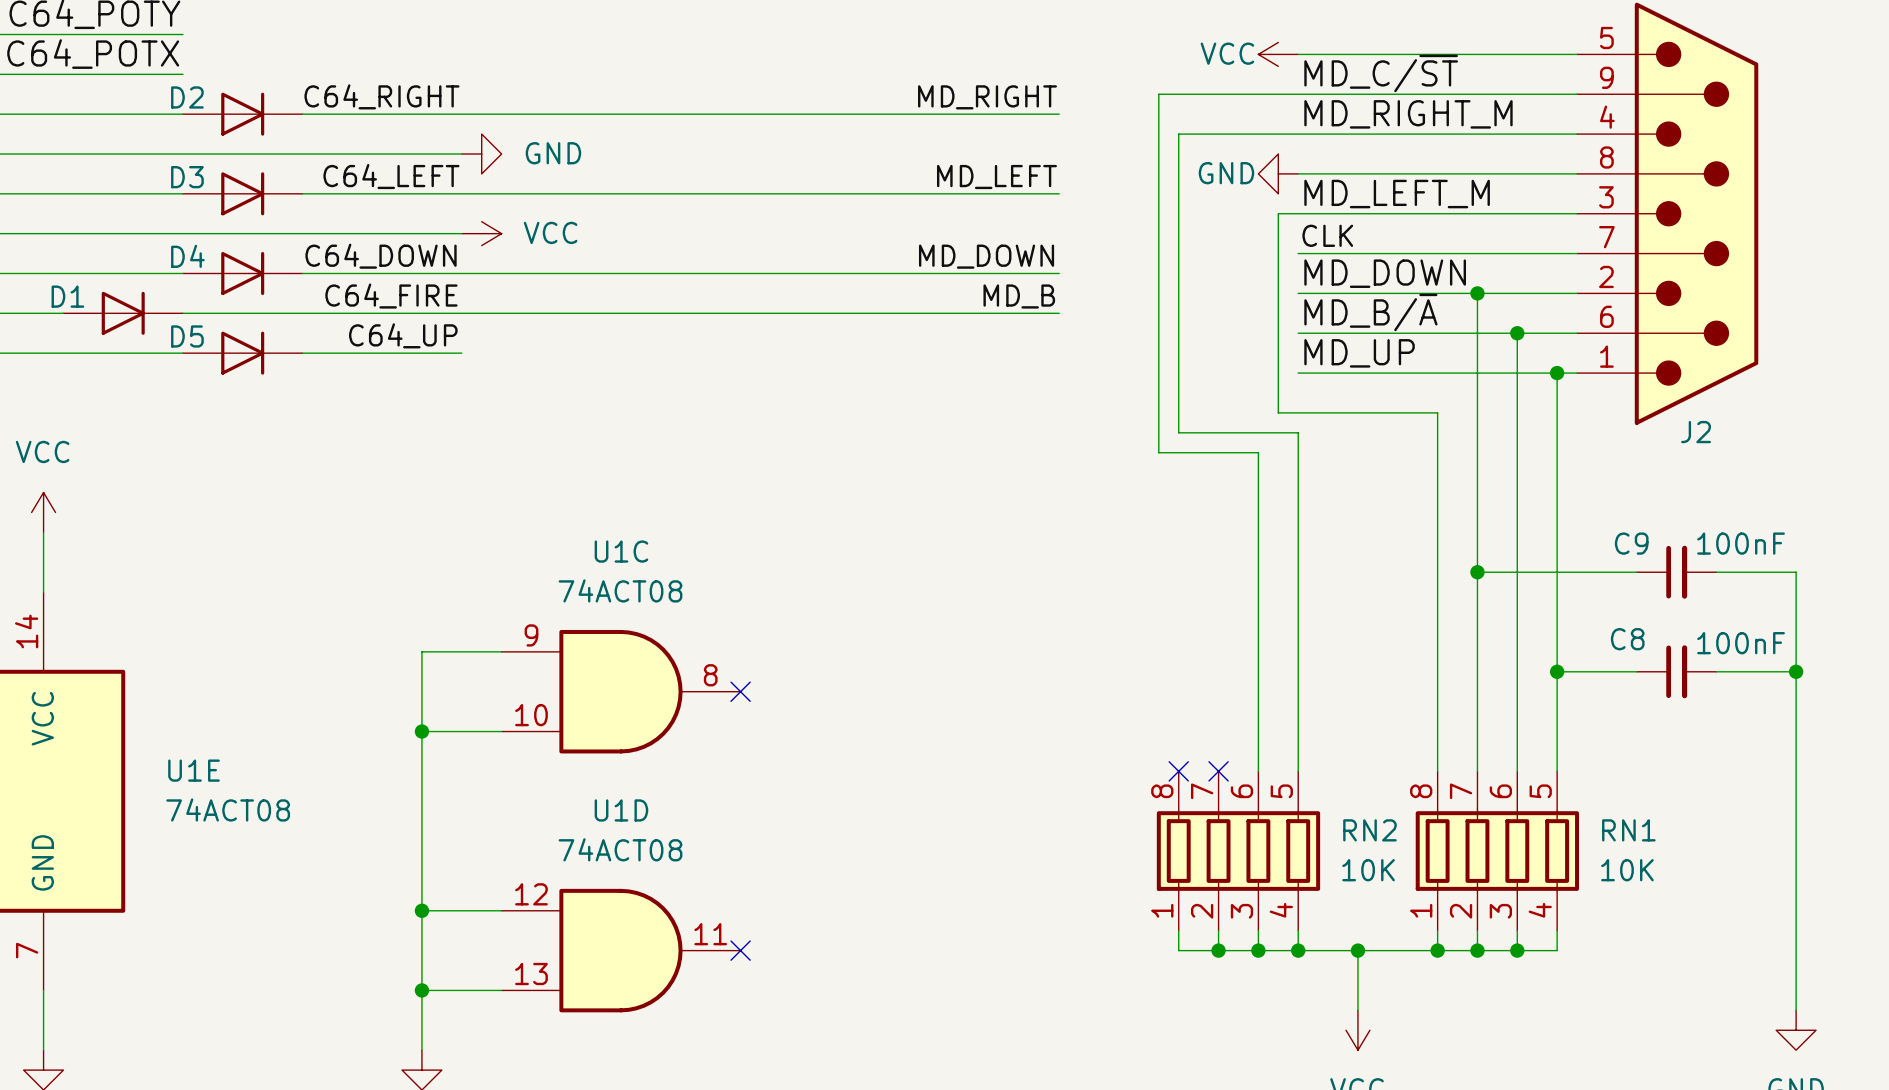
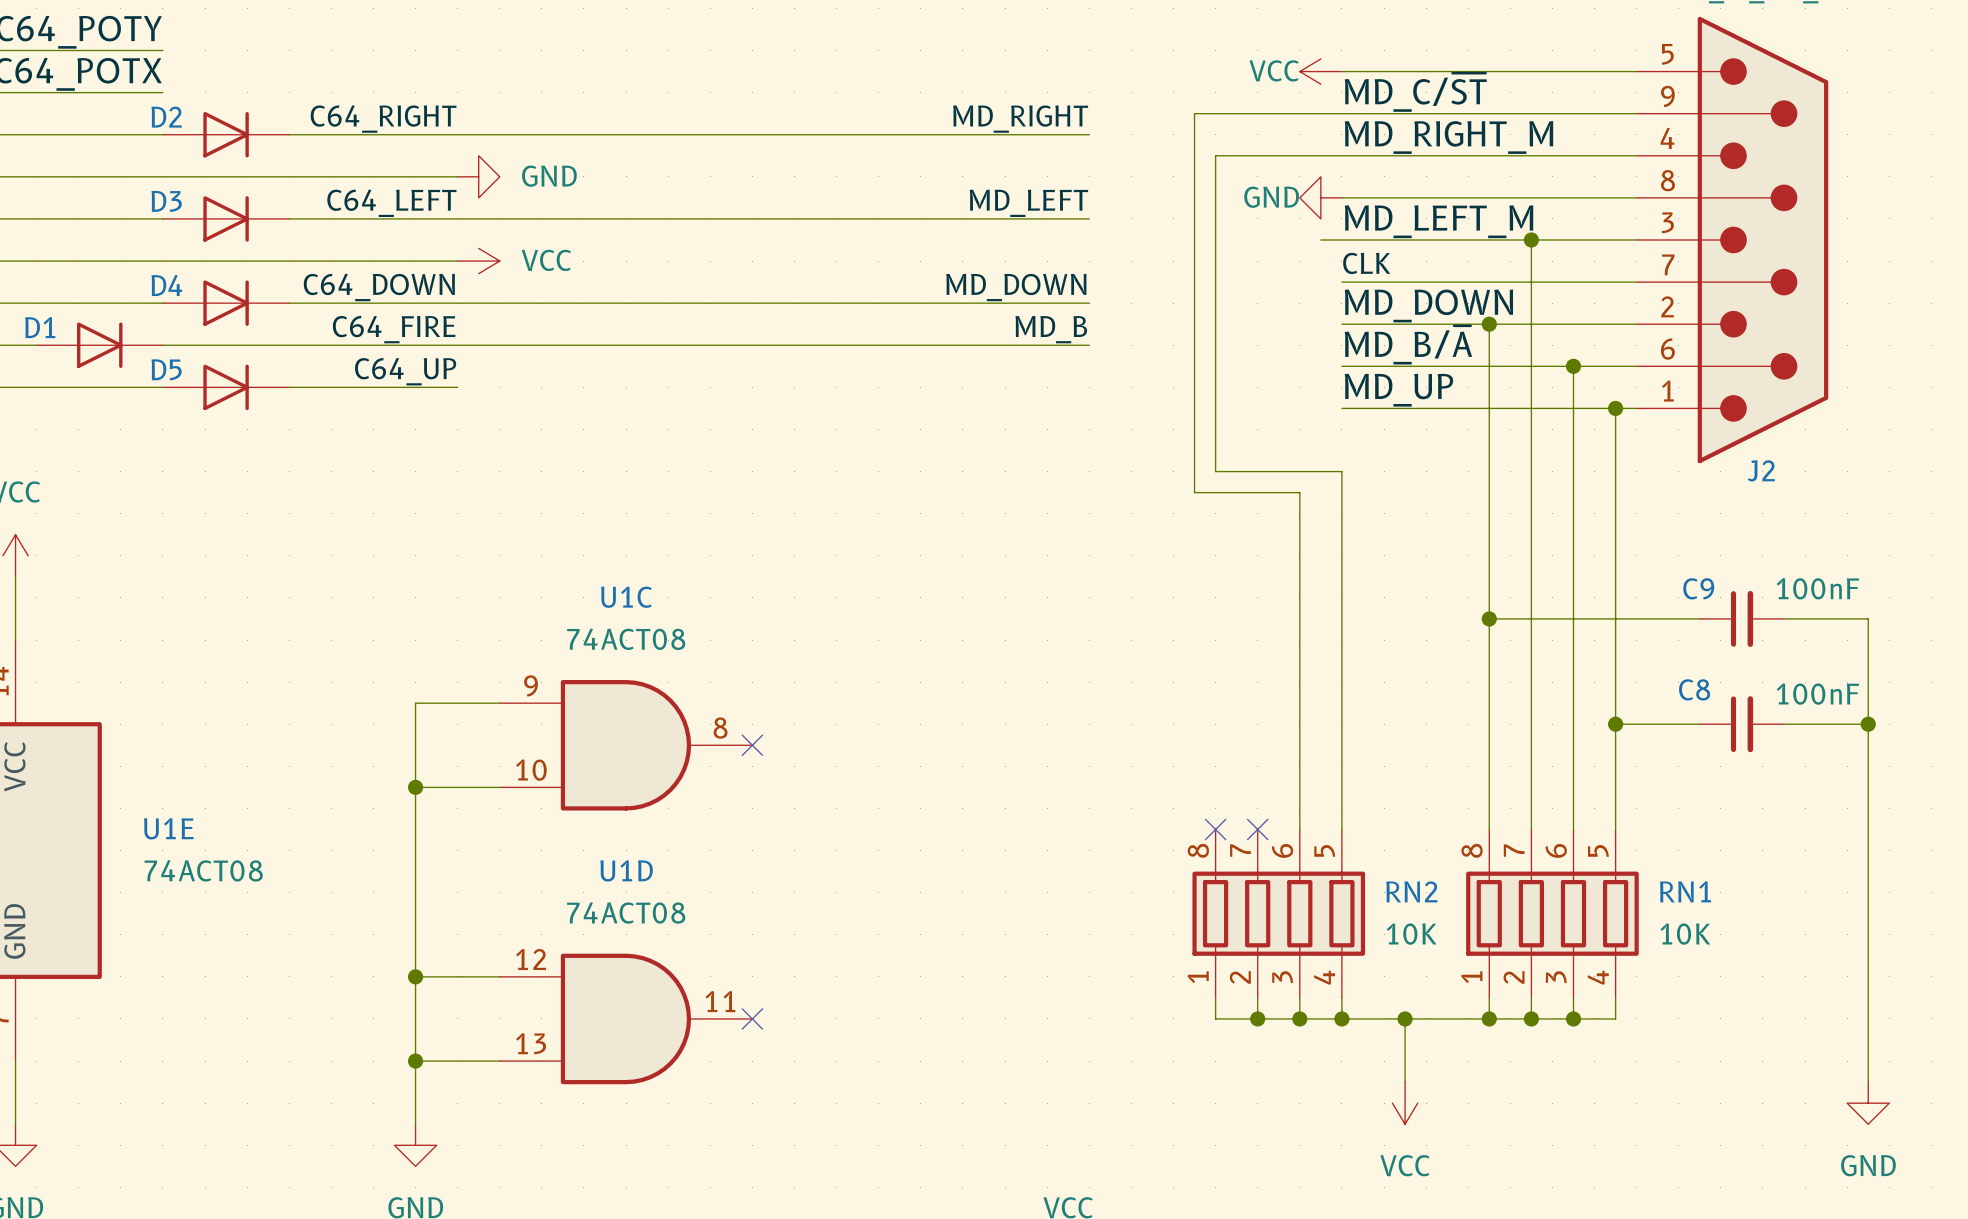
wire: (1278, 213) (1278, 412) (1437, 412) -> (1489, 324) (1489, 450)
wire: none -> (1531, 239) (1531, 324)
junction: none -> (1531, 239)
junction: none -> (1489, 324)
junction: (1477, 293) -> none
wire: none -> (1489, 618) (1531, 618)
junction position: (1477, 572) -> (1489, 618)

